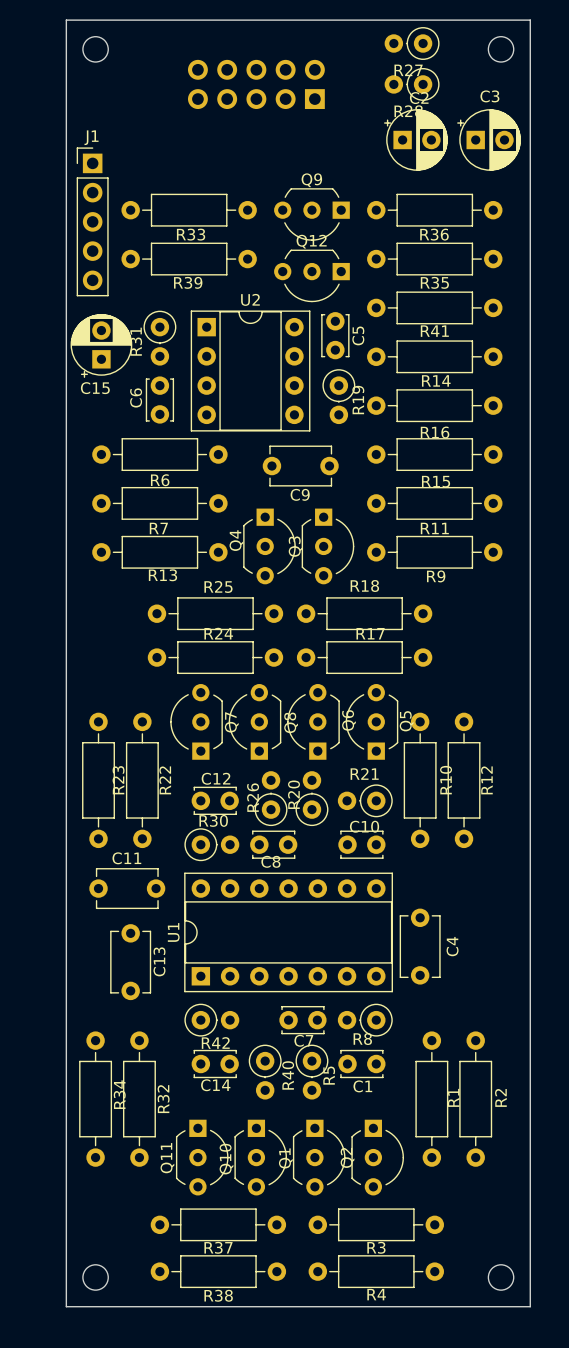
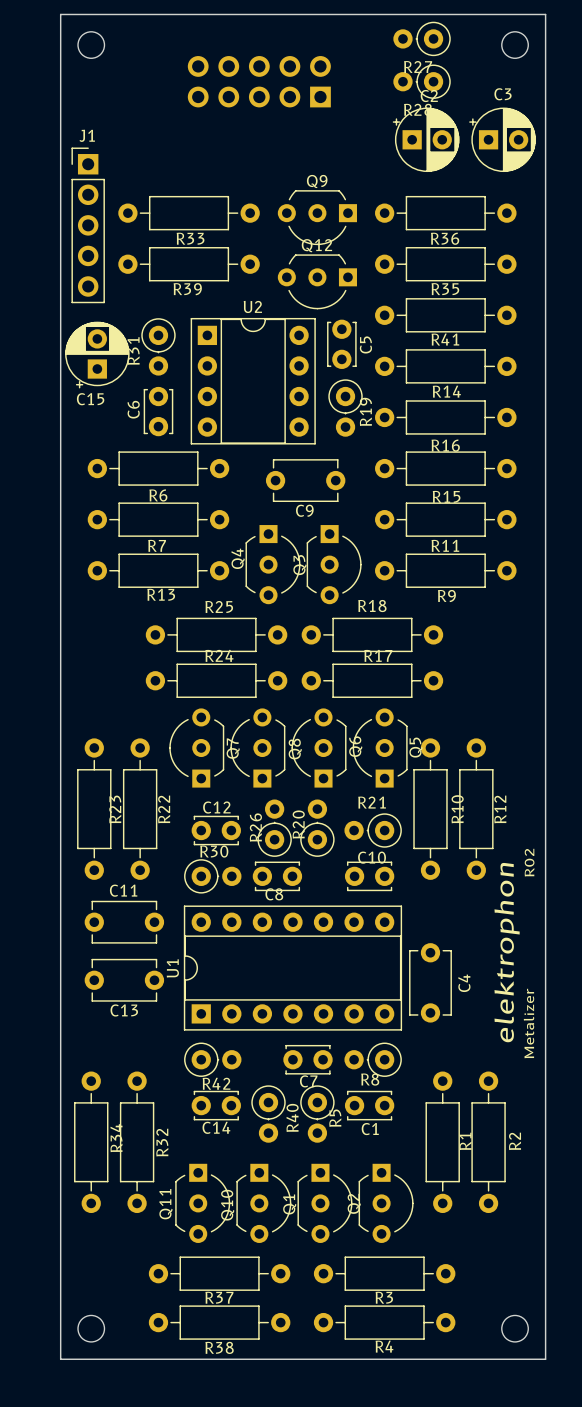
drawing: none -> [494, 848, 535, 1059]
C13 rotation: 0° (130, 962) -> 90° clockwise (124, 980)

